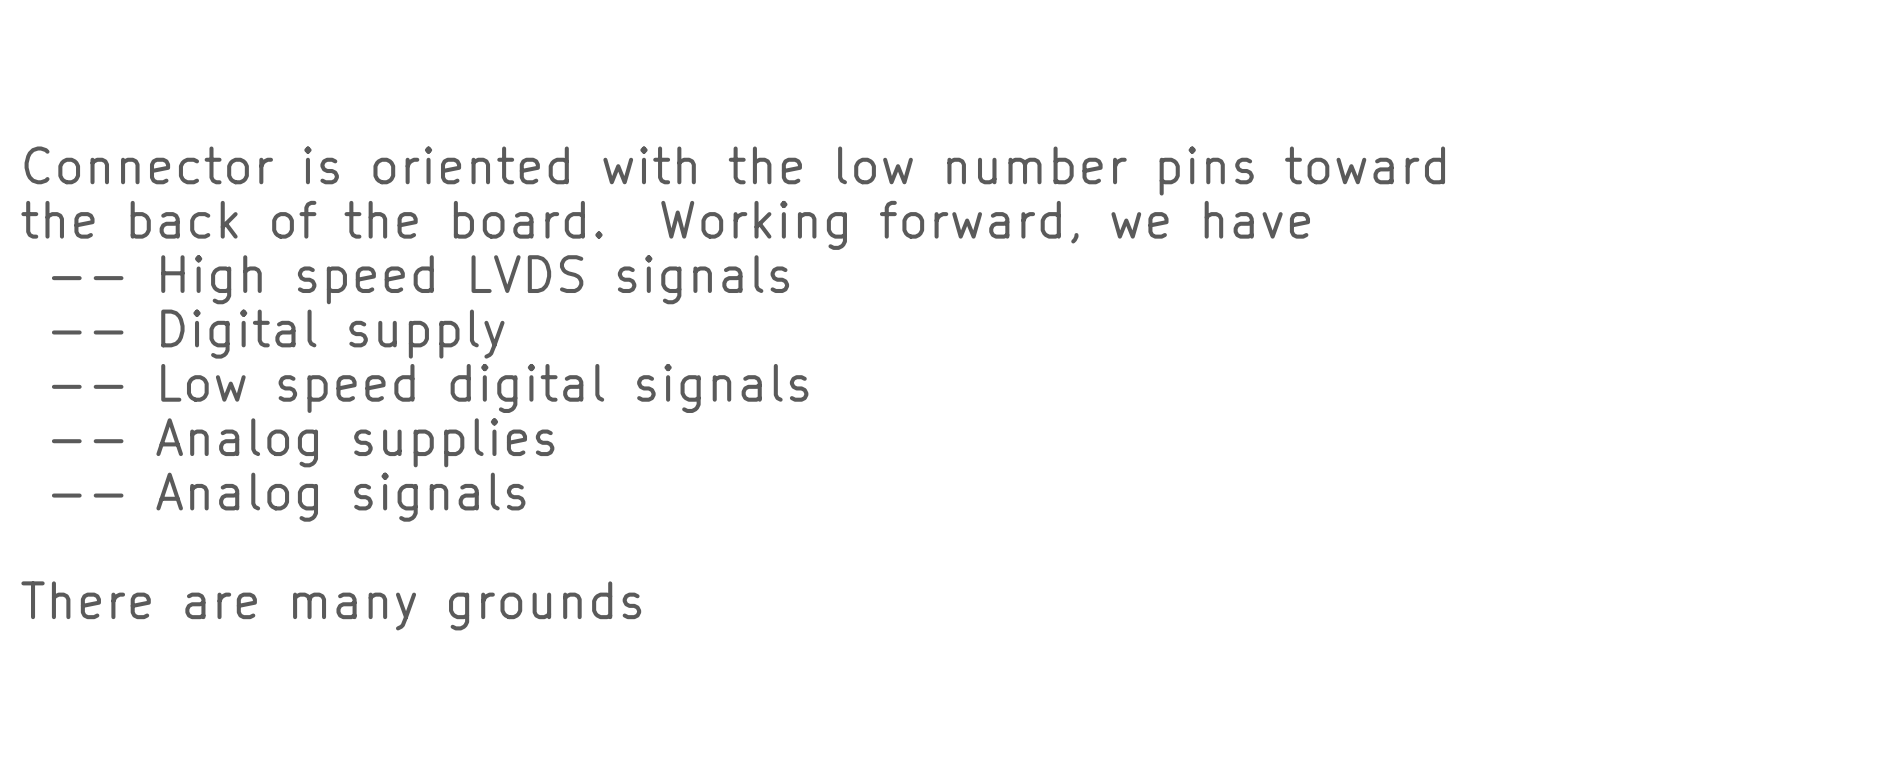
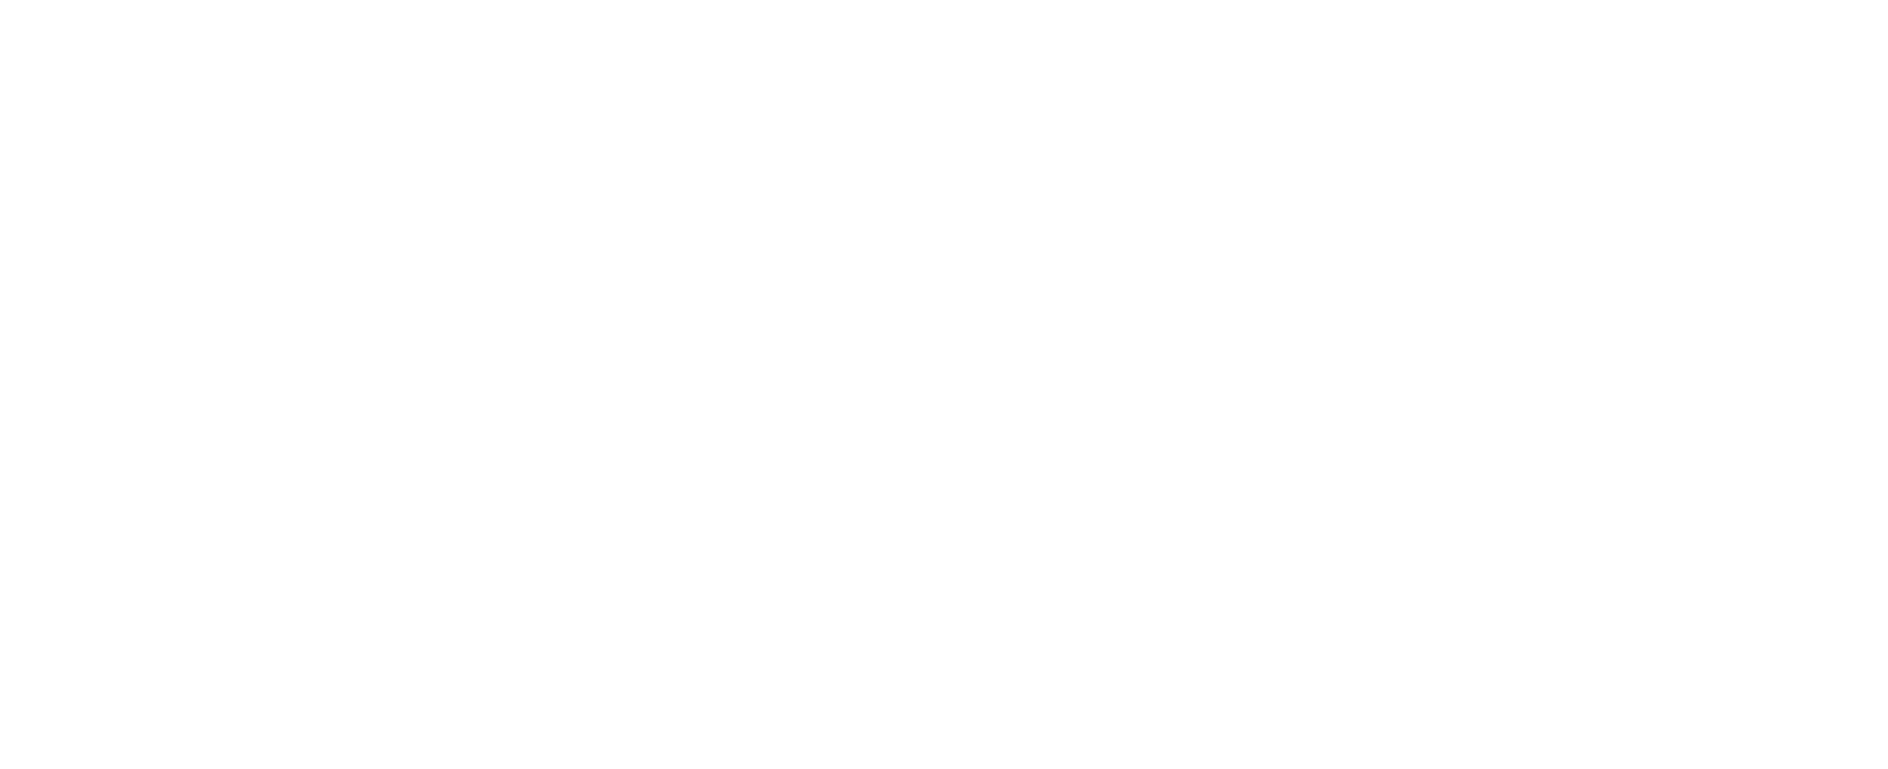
text: Connector is oriented with the low number pins toward (734, 171) -> none
text: the back of the board. Working forward, we have (665, 225) -> none
text: -- High speed LVDS signals (420, 279) -> none
text: -- Digital supply (278, 334) -> none
text: -- Low speed digital signals (430, 388) -> none
text: -- Analog supplies (303, 442) -> none
text: -- Analog signals (288, 497) -> none
text: There are many grounds (331, 605) -> none

